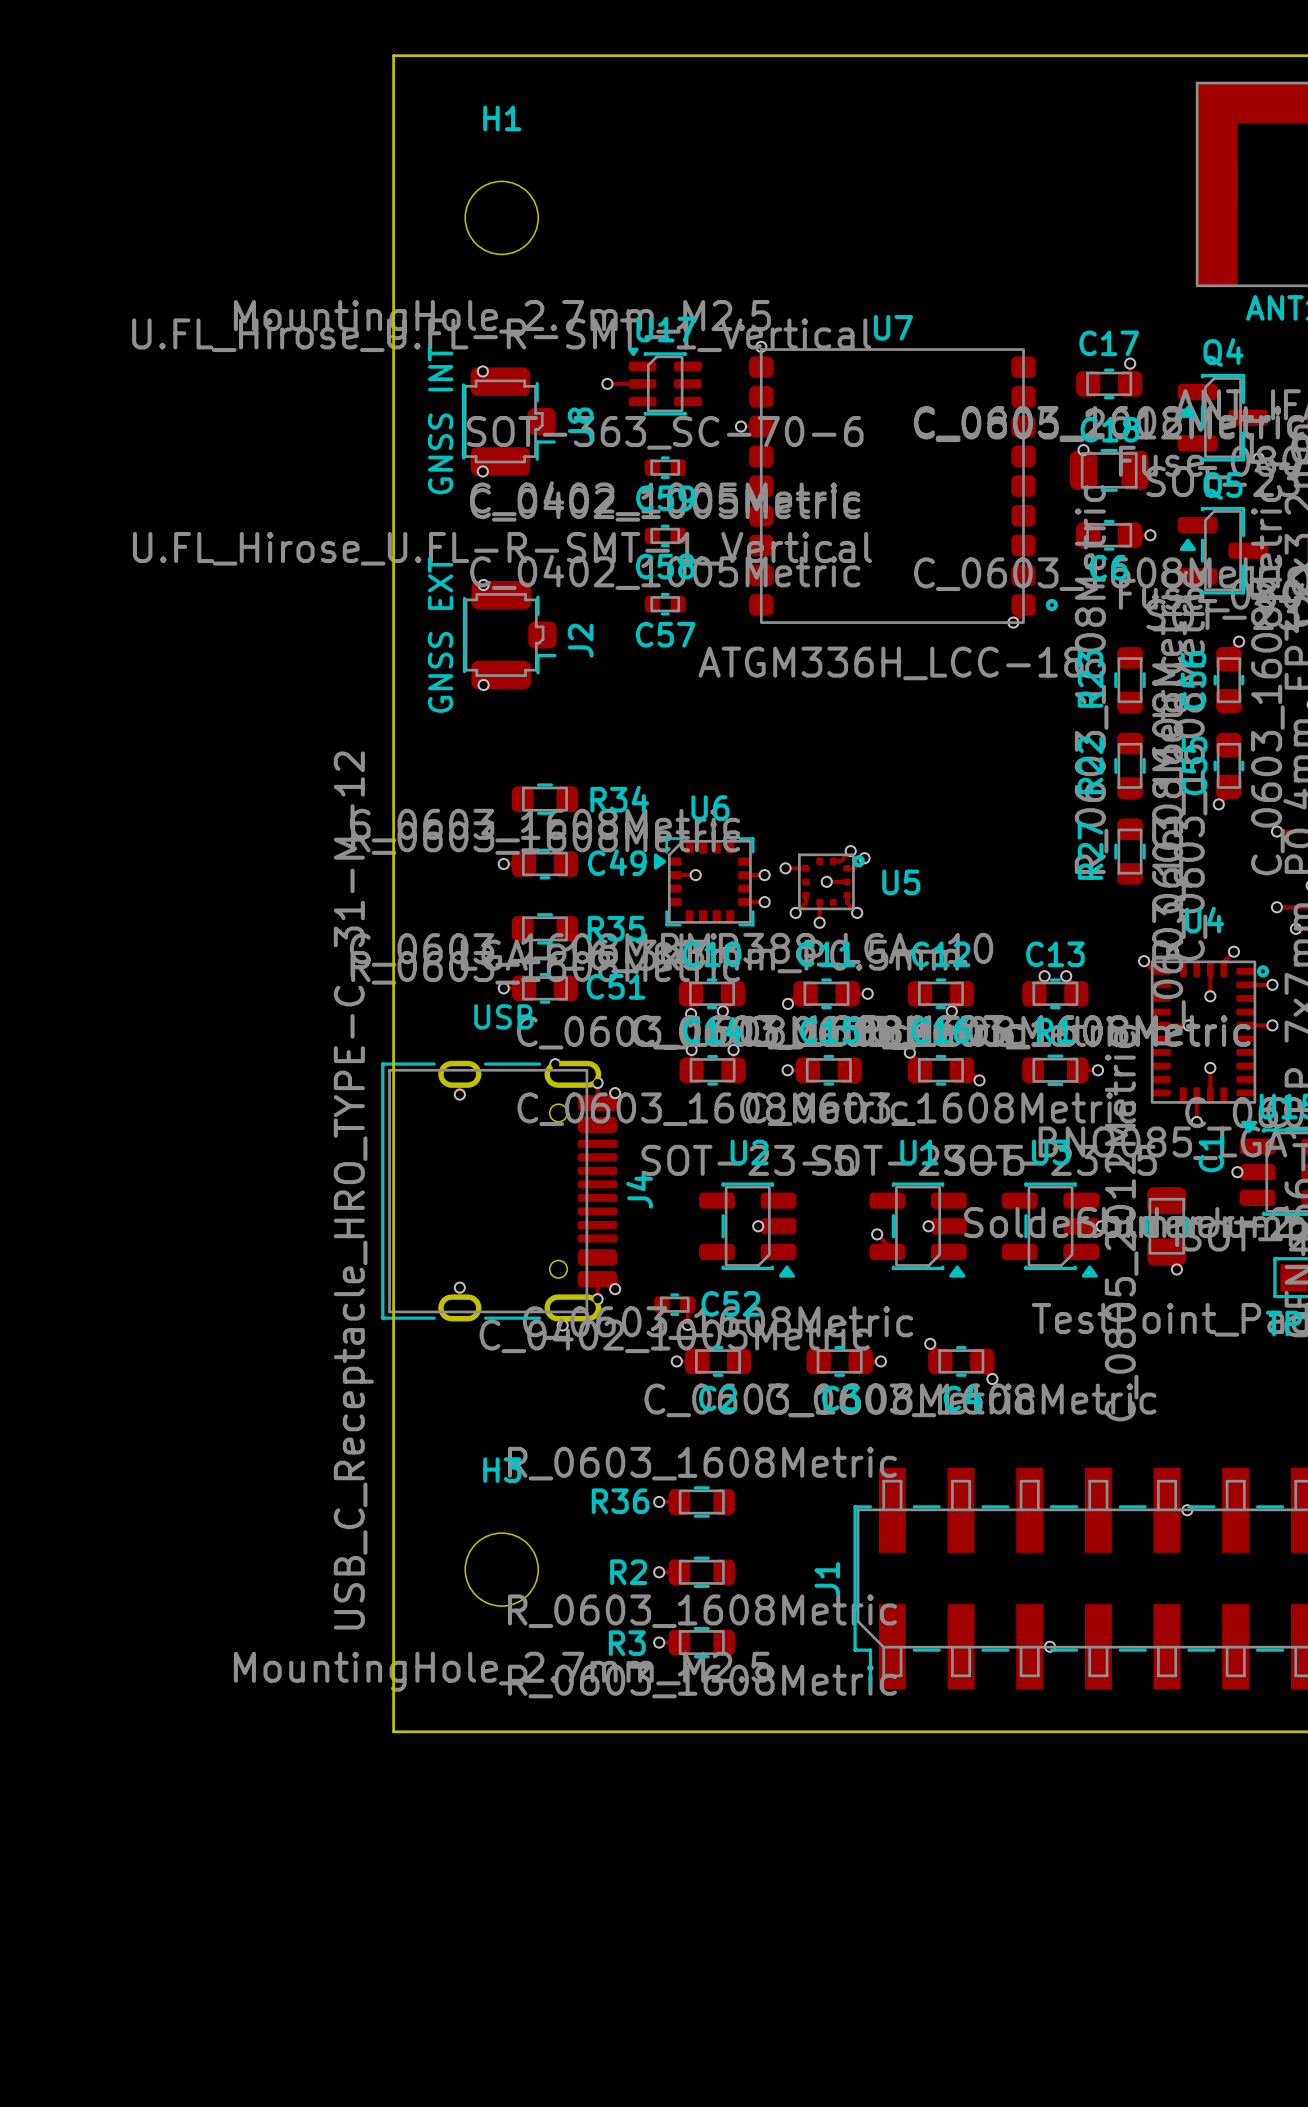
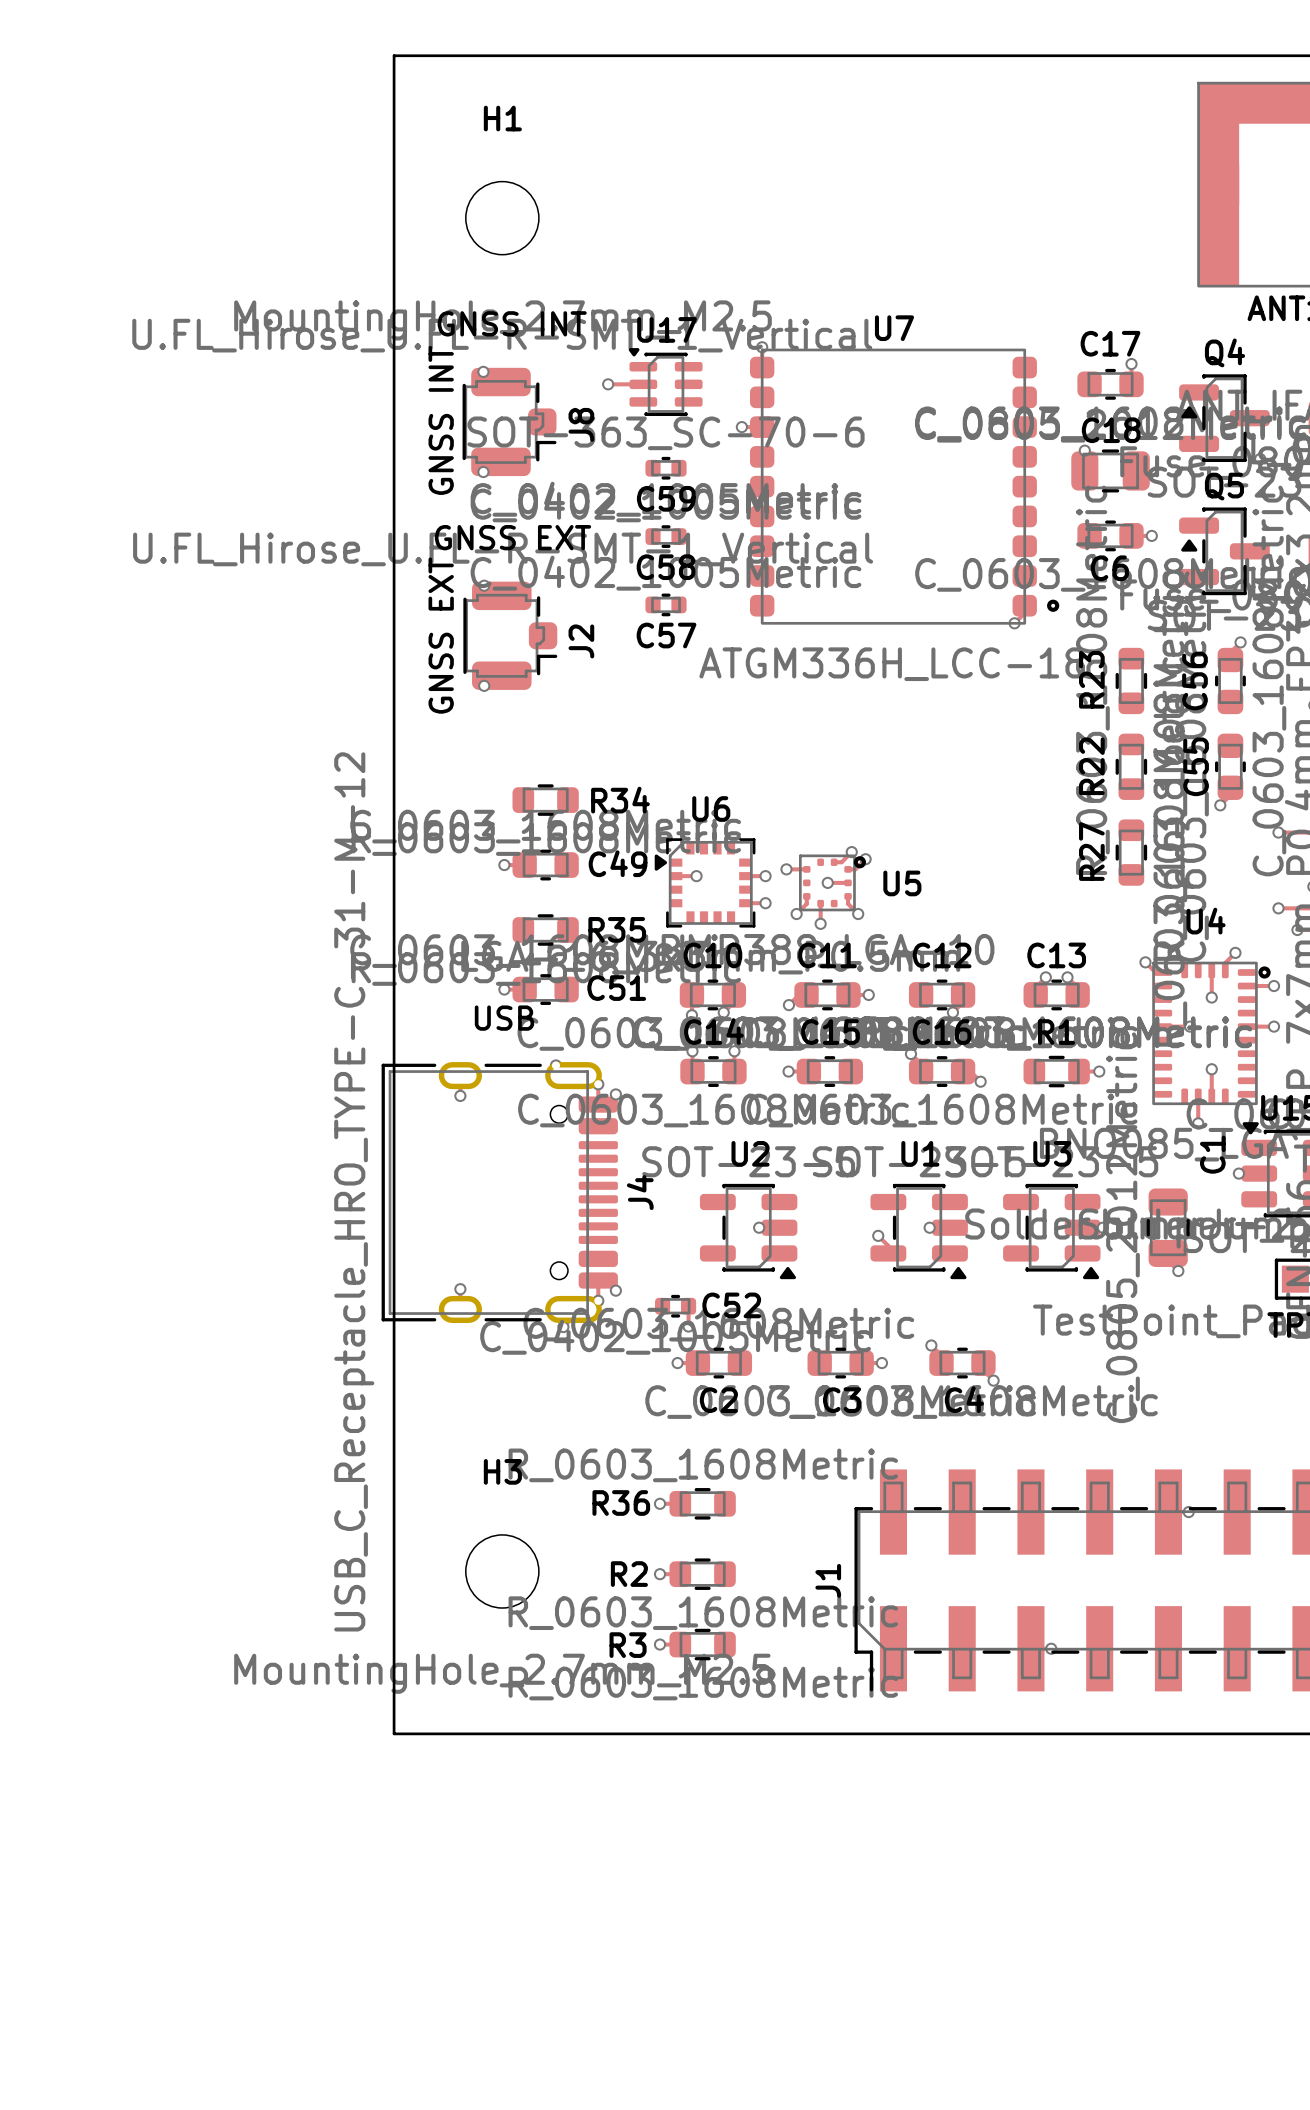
text: none -> GNSS INT (512, 323)
text: none -> GNSS EXT (512, 537)

